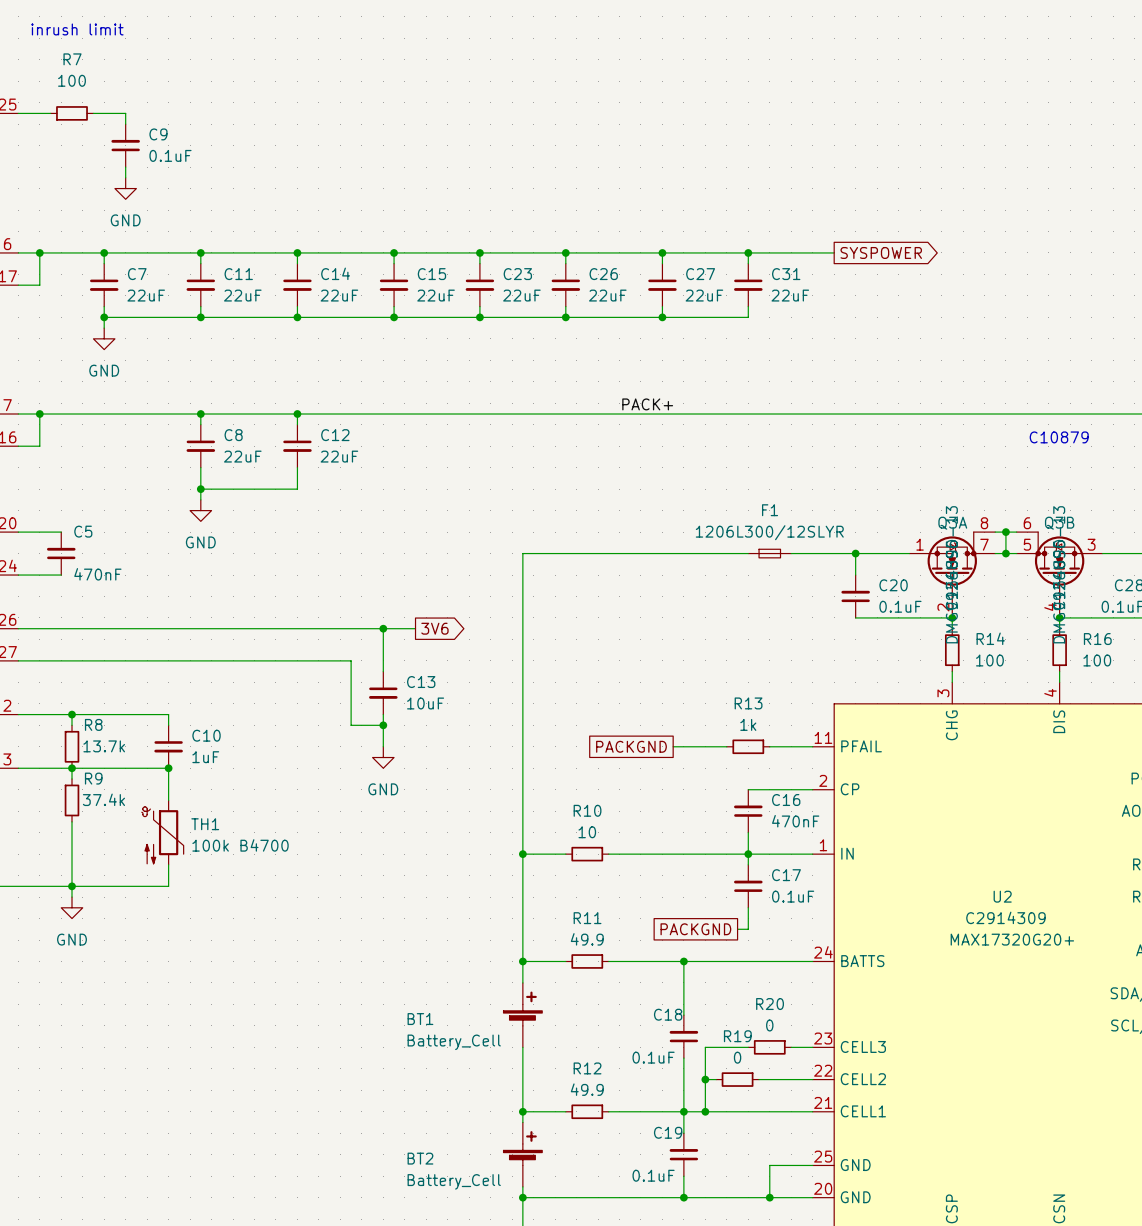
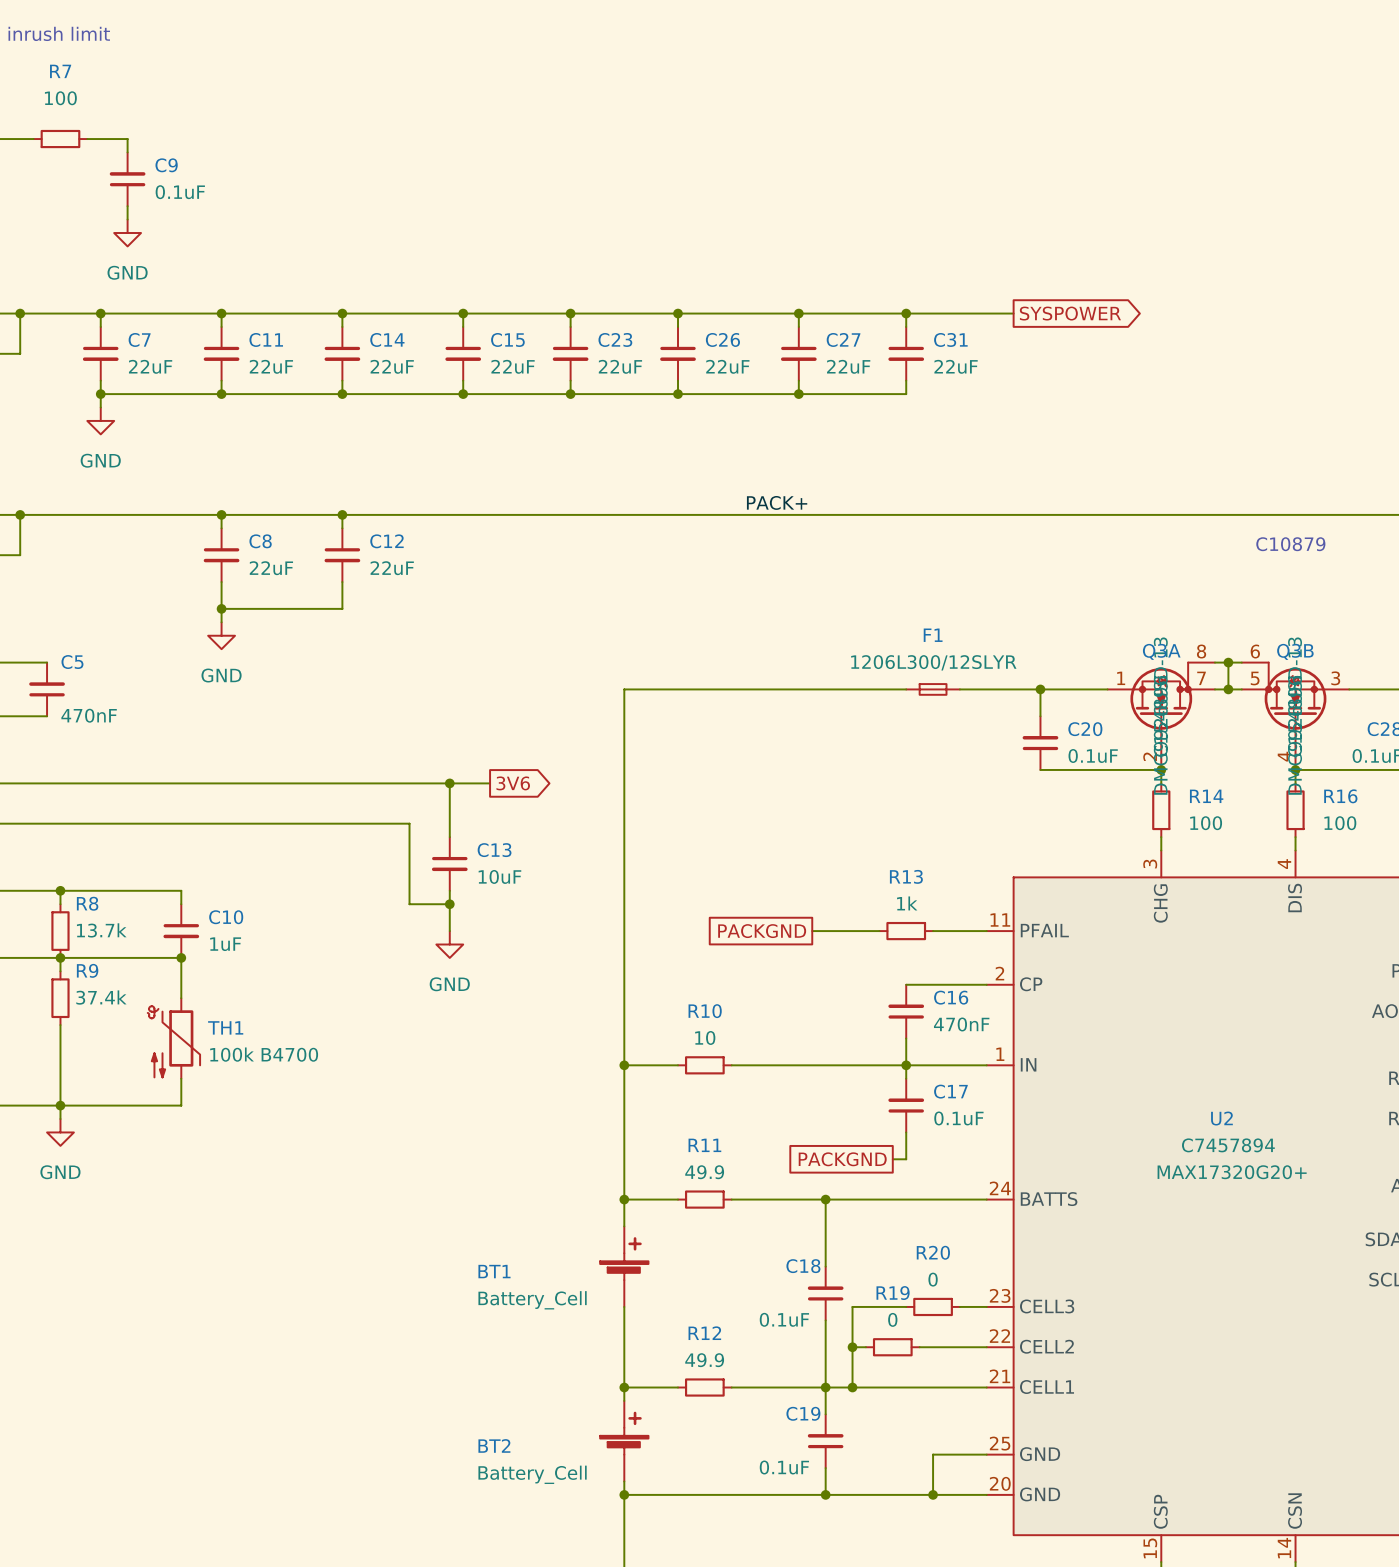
U2 text: C2914309 (1005, 917) -> C7457894 (1228, 1145)

